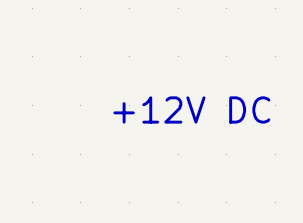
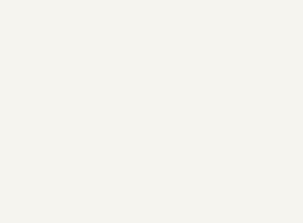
text: +12V DC (191, 109) -> none

